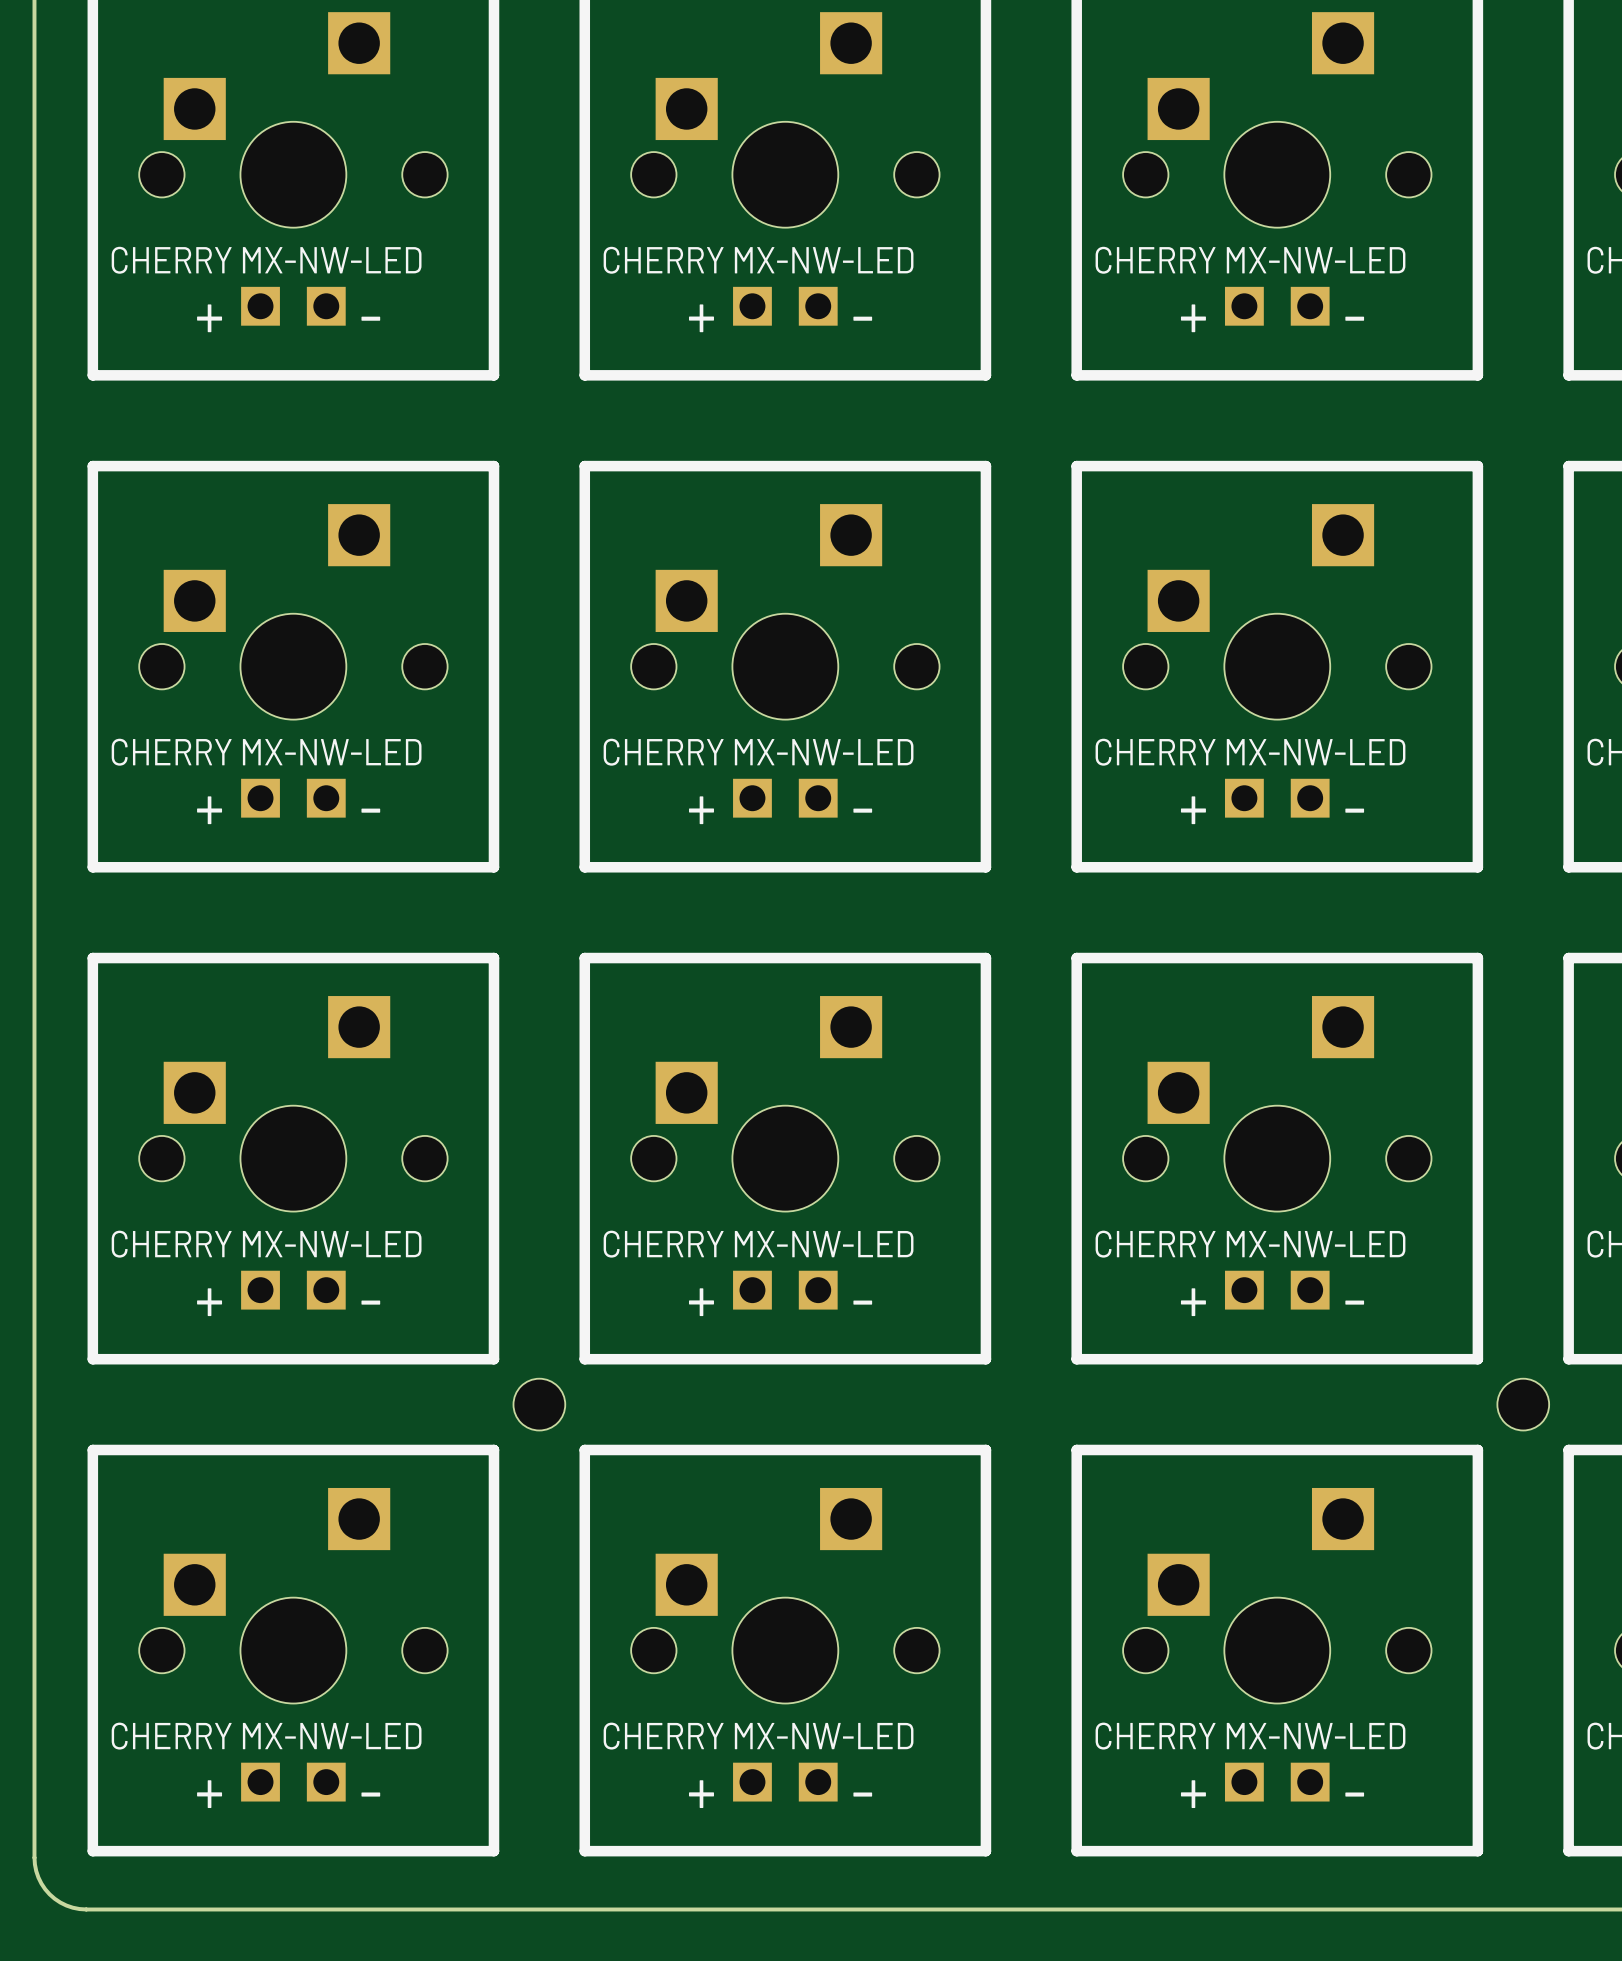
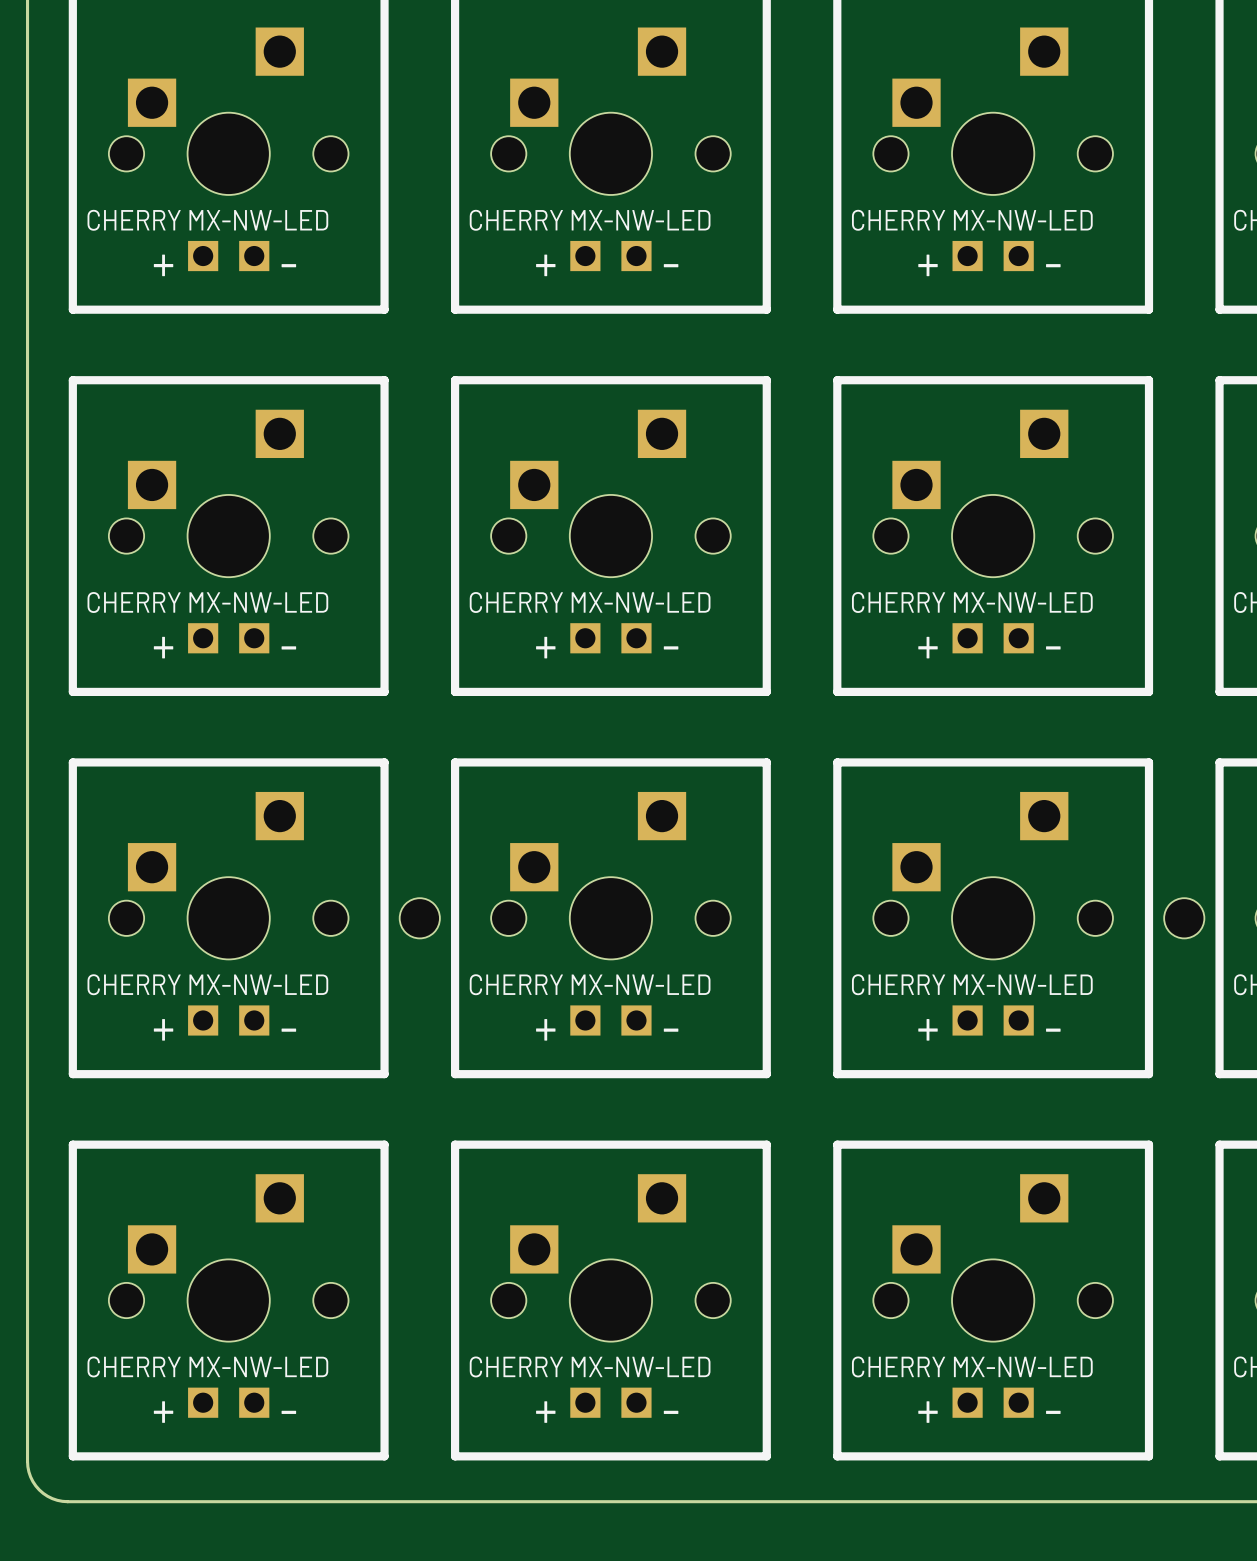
hole position: (539, 1404) -> (419, 918)
hole position: (1523, 1404) -> (1184, 918)

